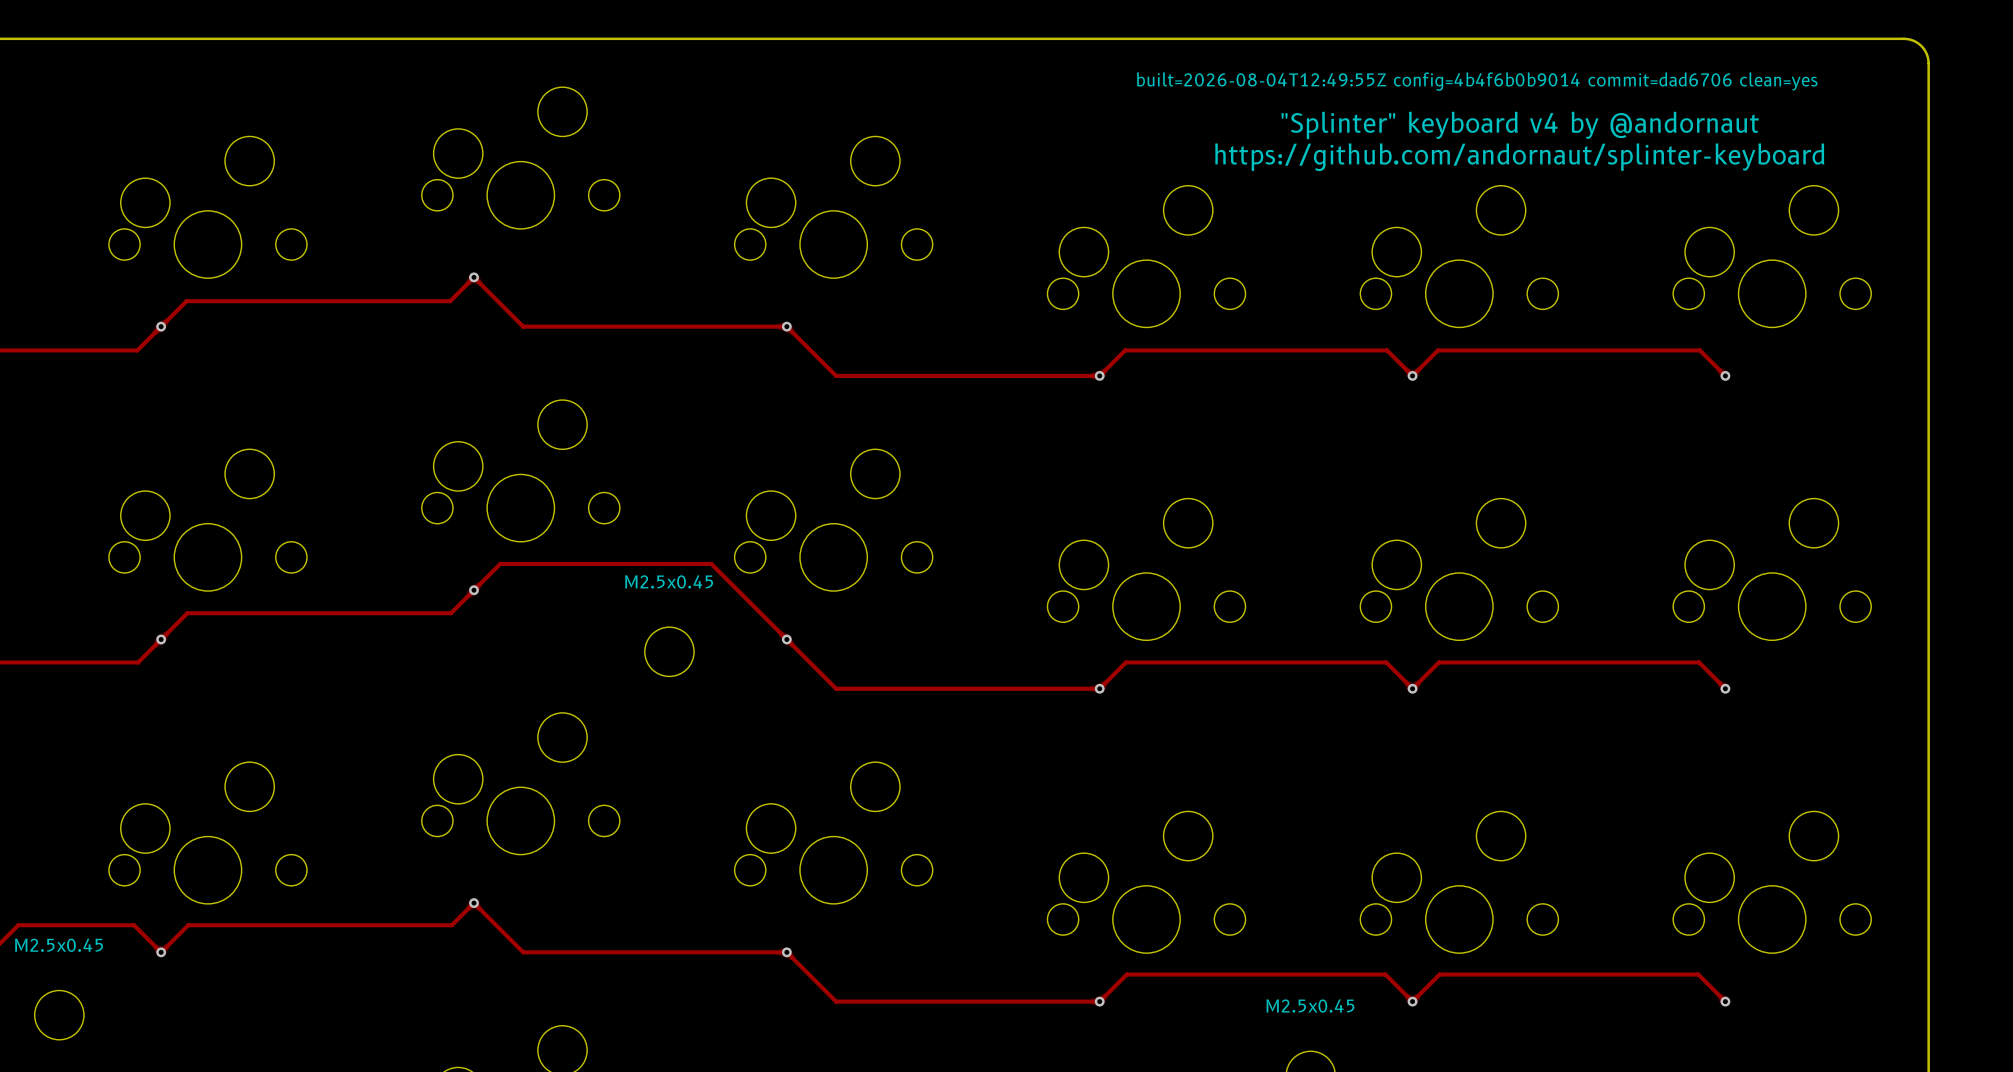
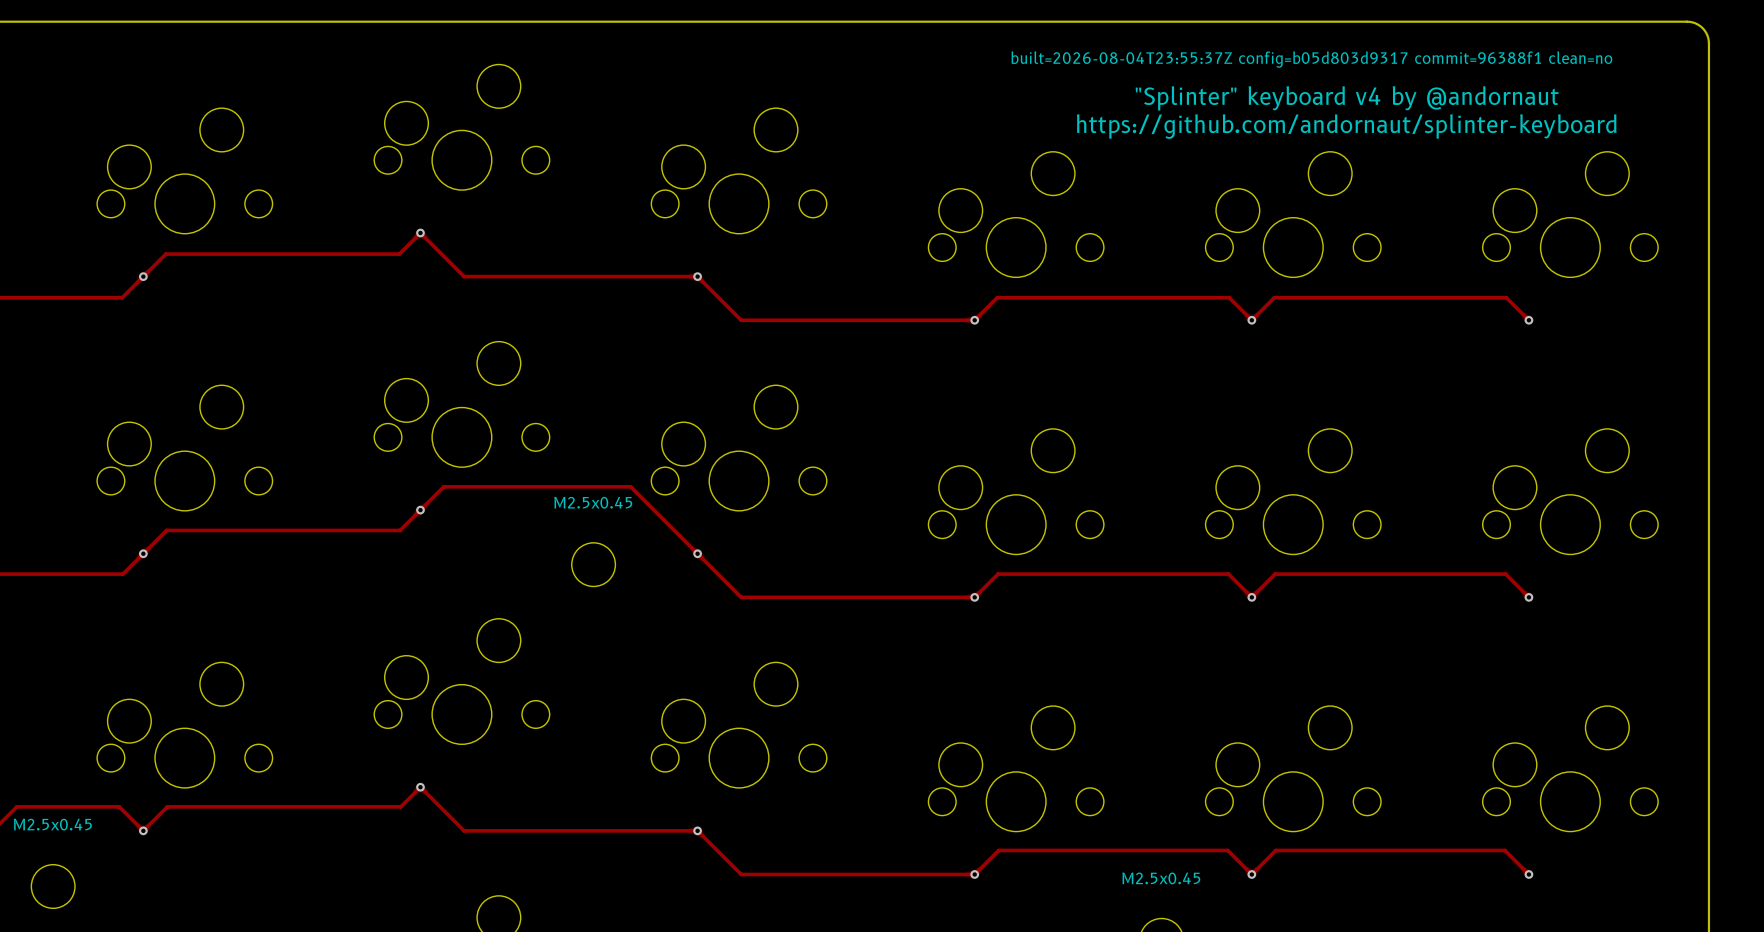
text: built=2026-08-04T12:49:55Z config=4b4f6b0b9014 commit=dad6706 clean=yes (1477, 81) -> built=2026-08-04T23:55:37Z config=b05d803d9317 commit=96388f1 clean=no (1311, 59)

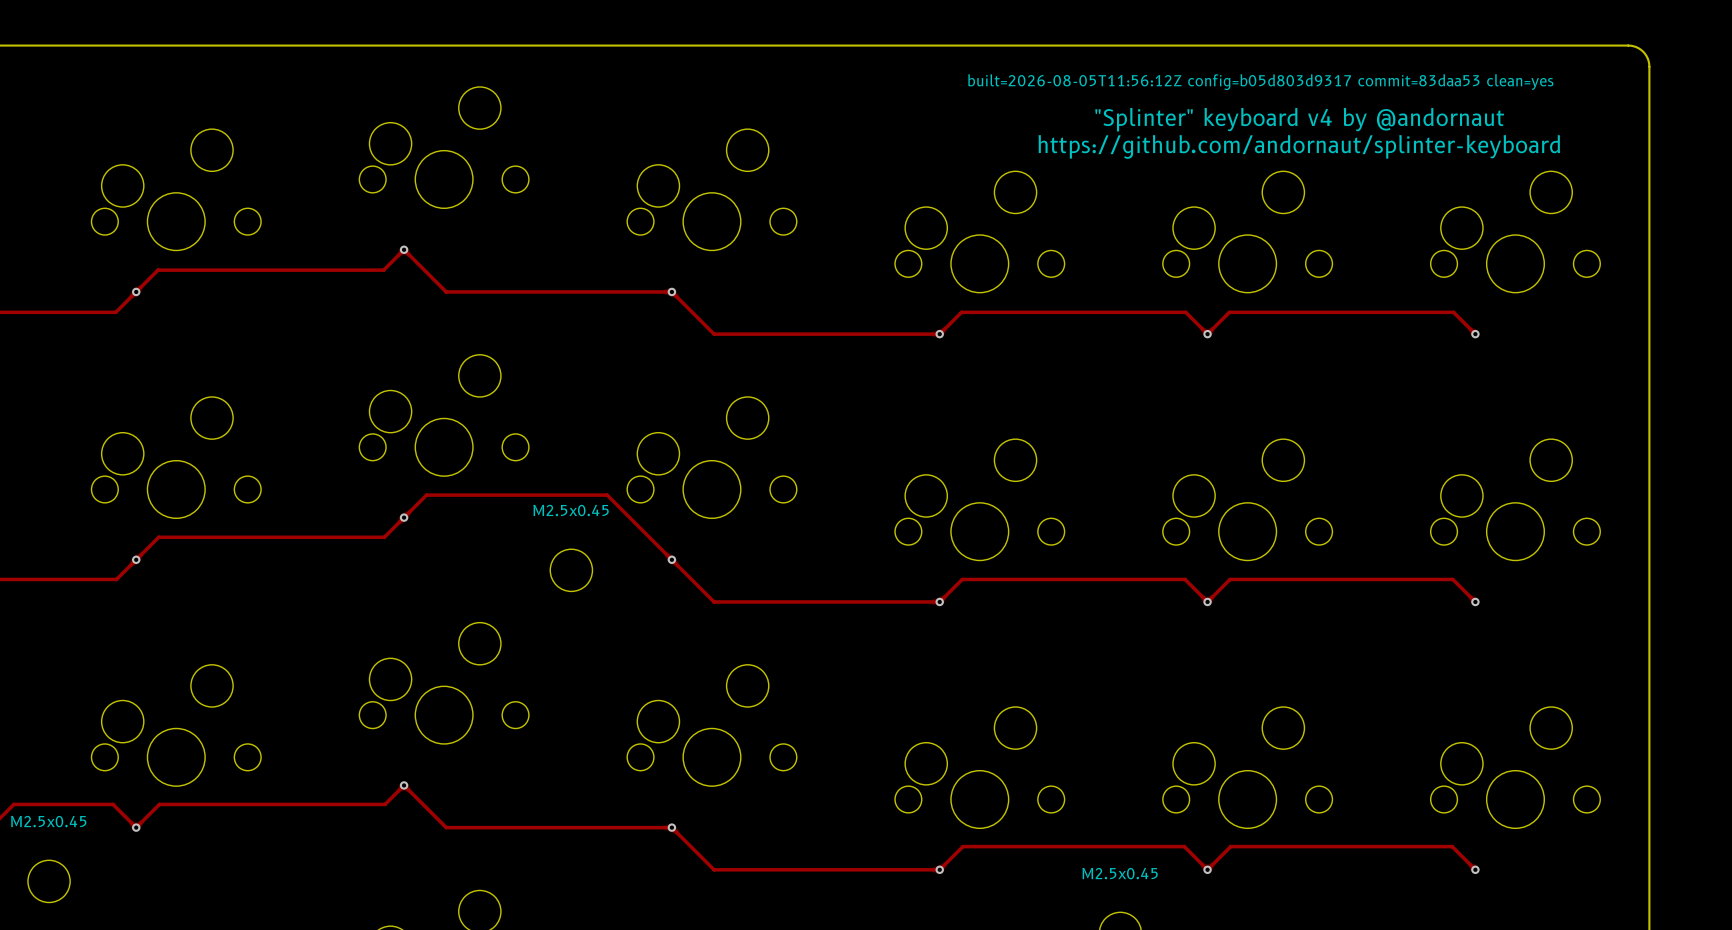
text: built=2026-08-04T23:55:37Z config=b05d803d9317 commit=96388f1 clean=no (1311, 59) -> built=2026-08-05T11:56:12Z config=b05d803d9317 commit=83daa53 clean=yes (1260, 82)

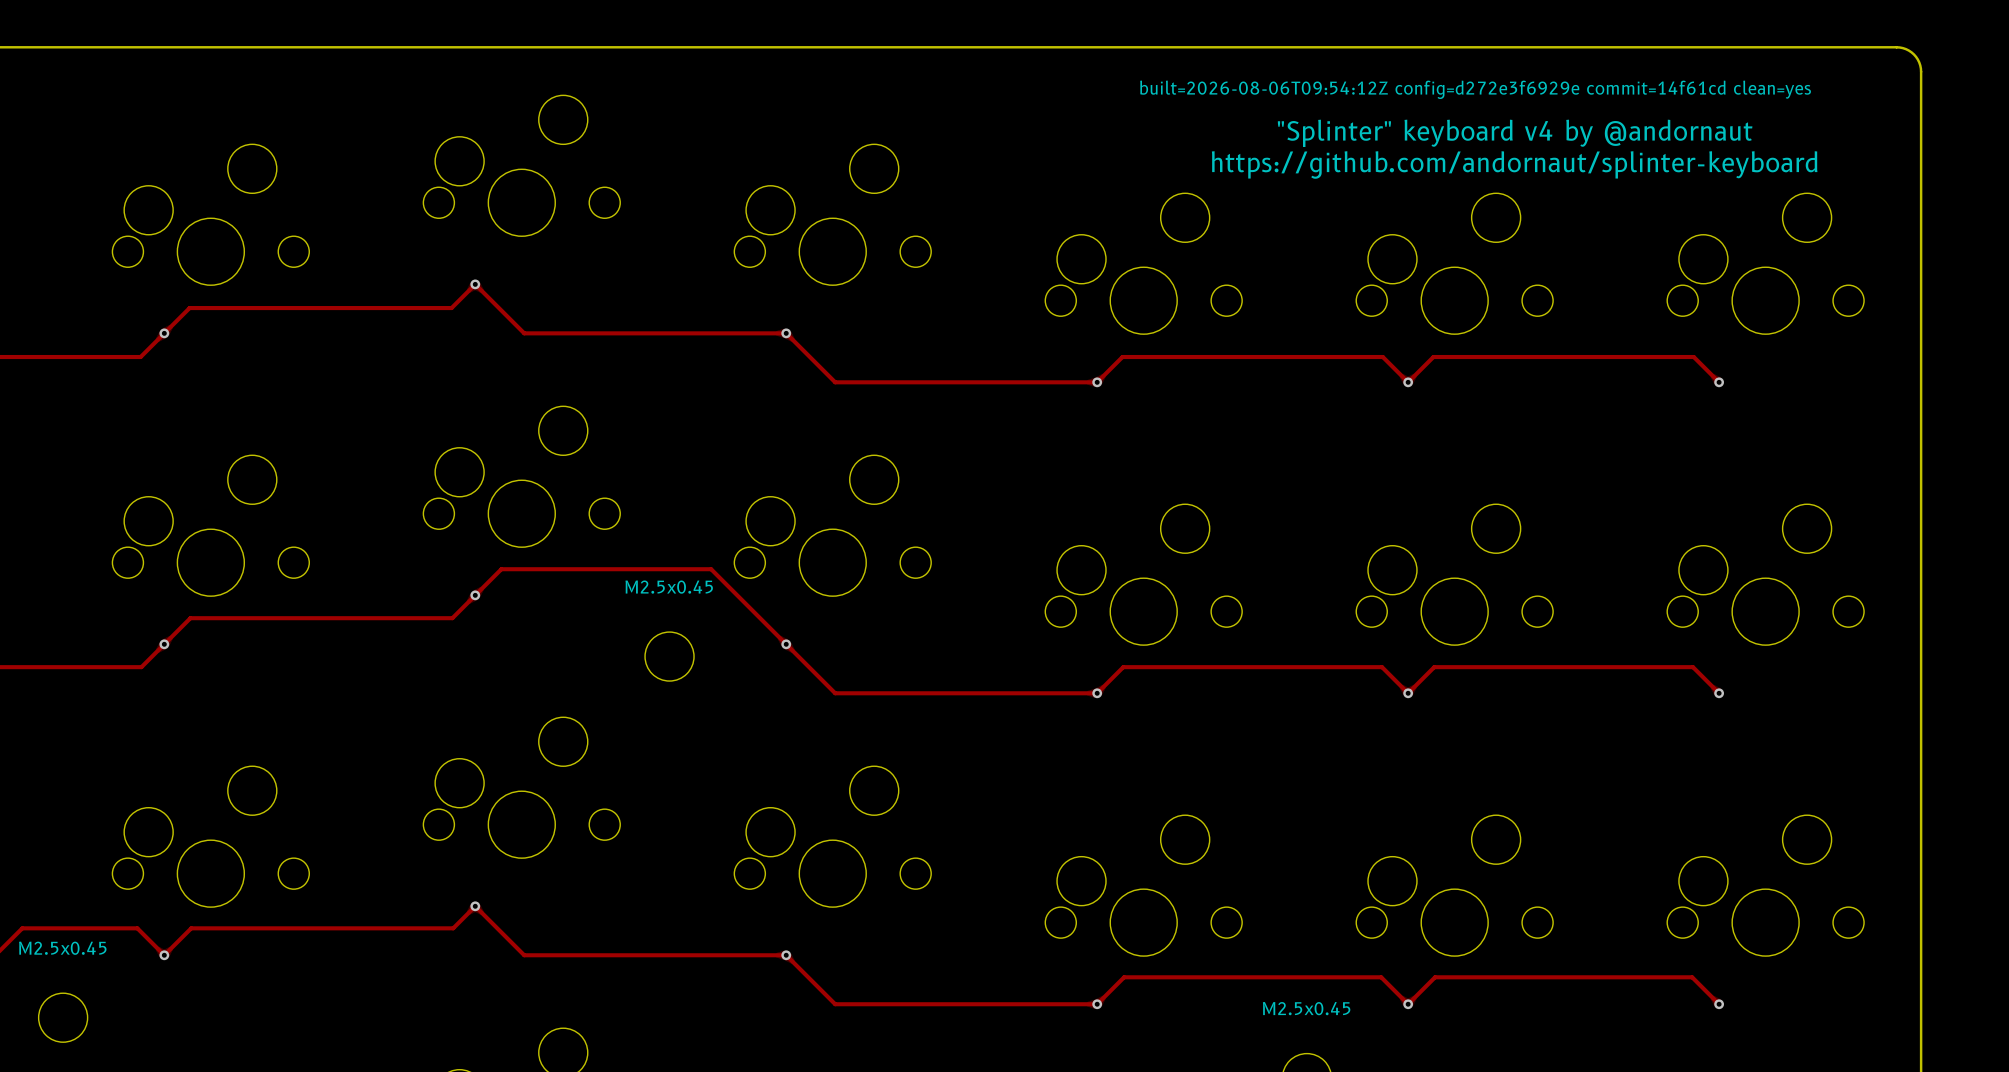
text: built=2026-08-05T11:56:12Z config=b05d803d9317 commit=83daa53 clean=yes (1260, 82) -> built=2026-08-06T09:54:12Z config=d272e3f6929e commit=14f61cd clean=yes (1475, 89)

